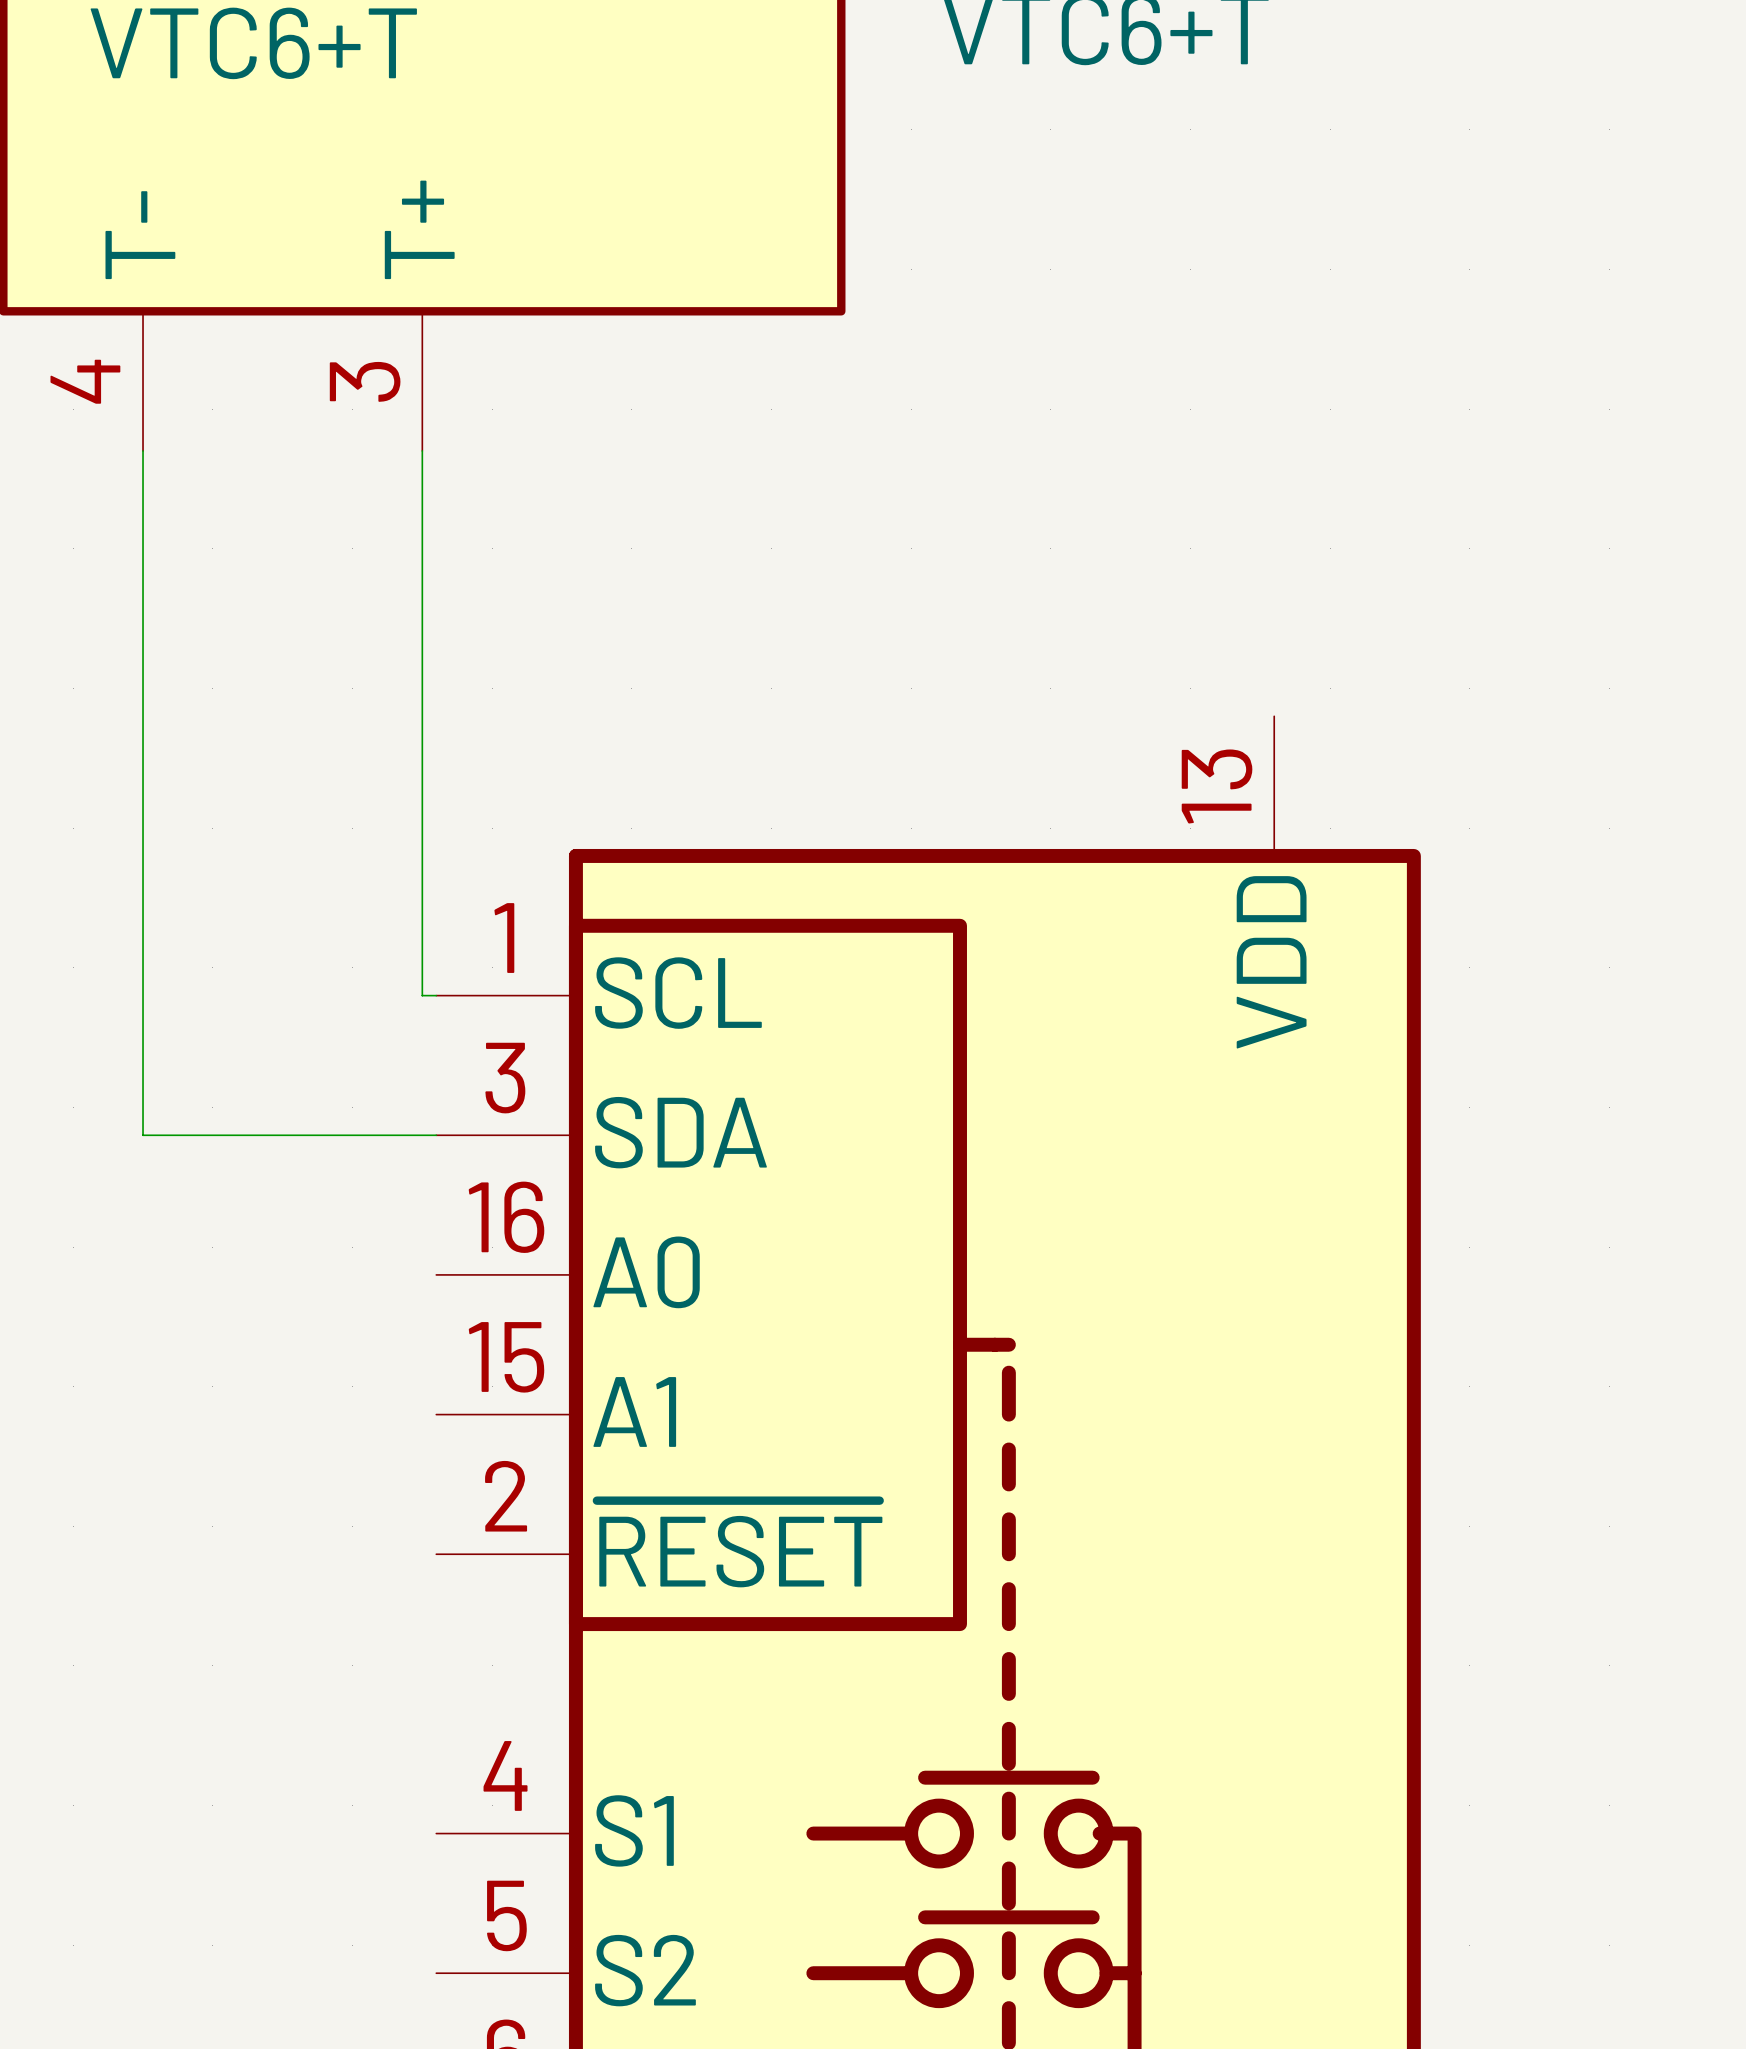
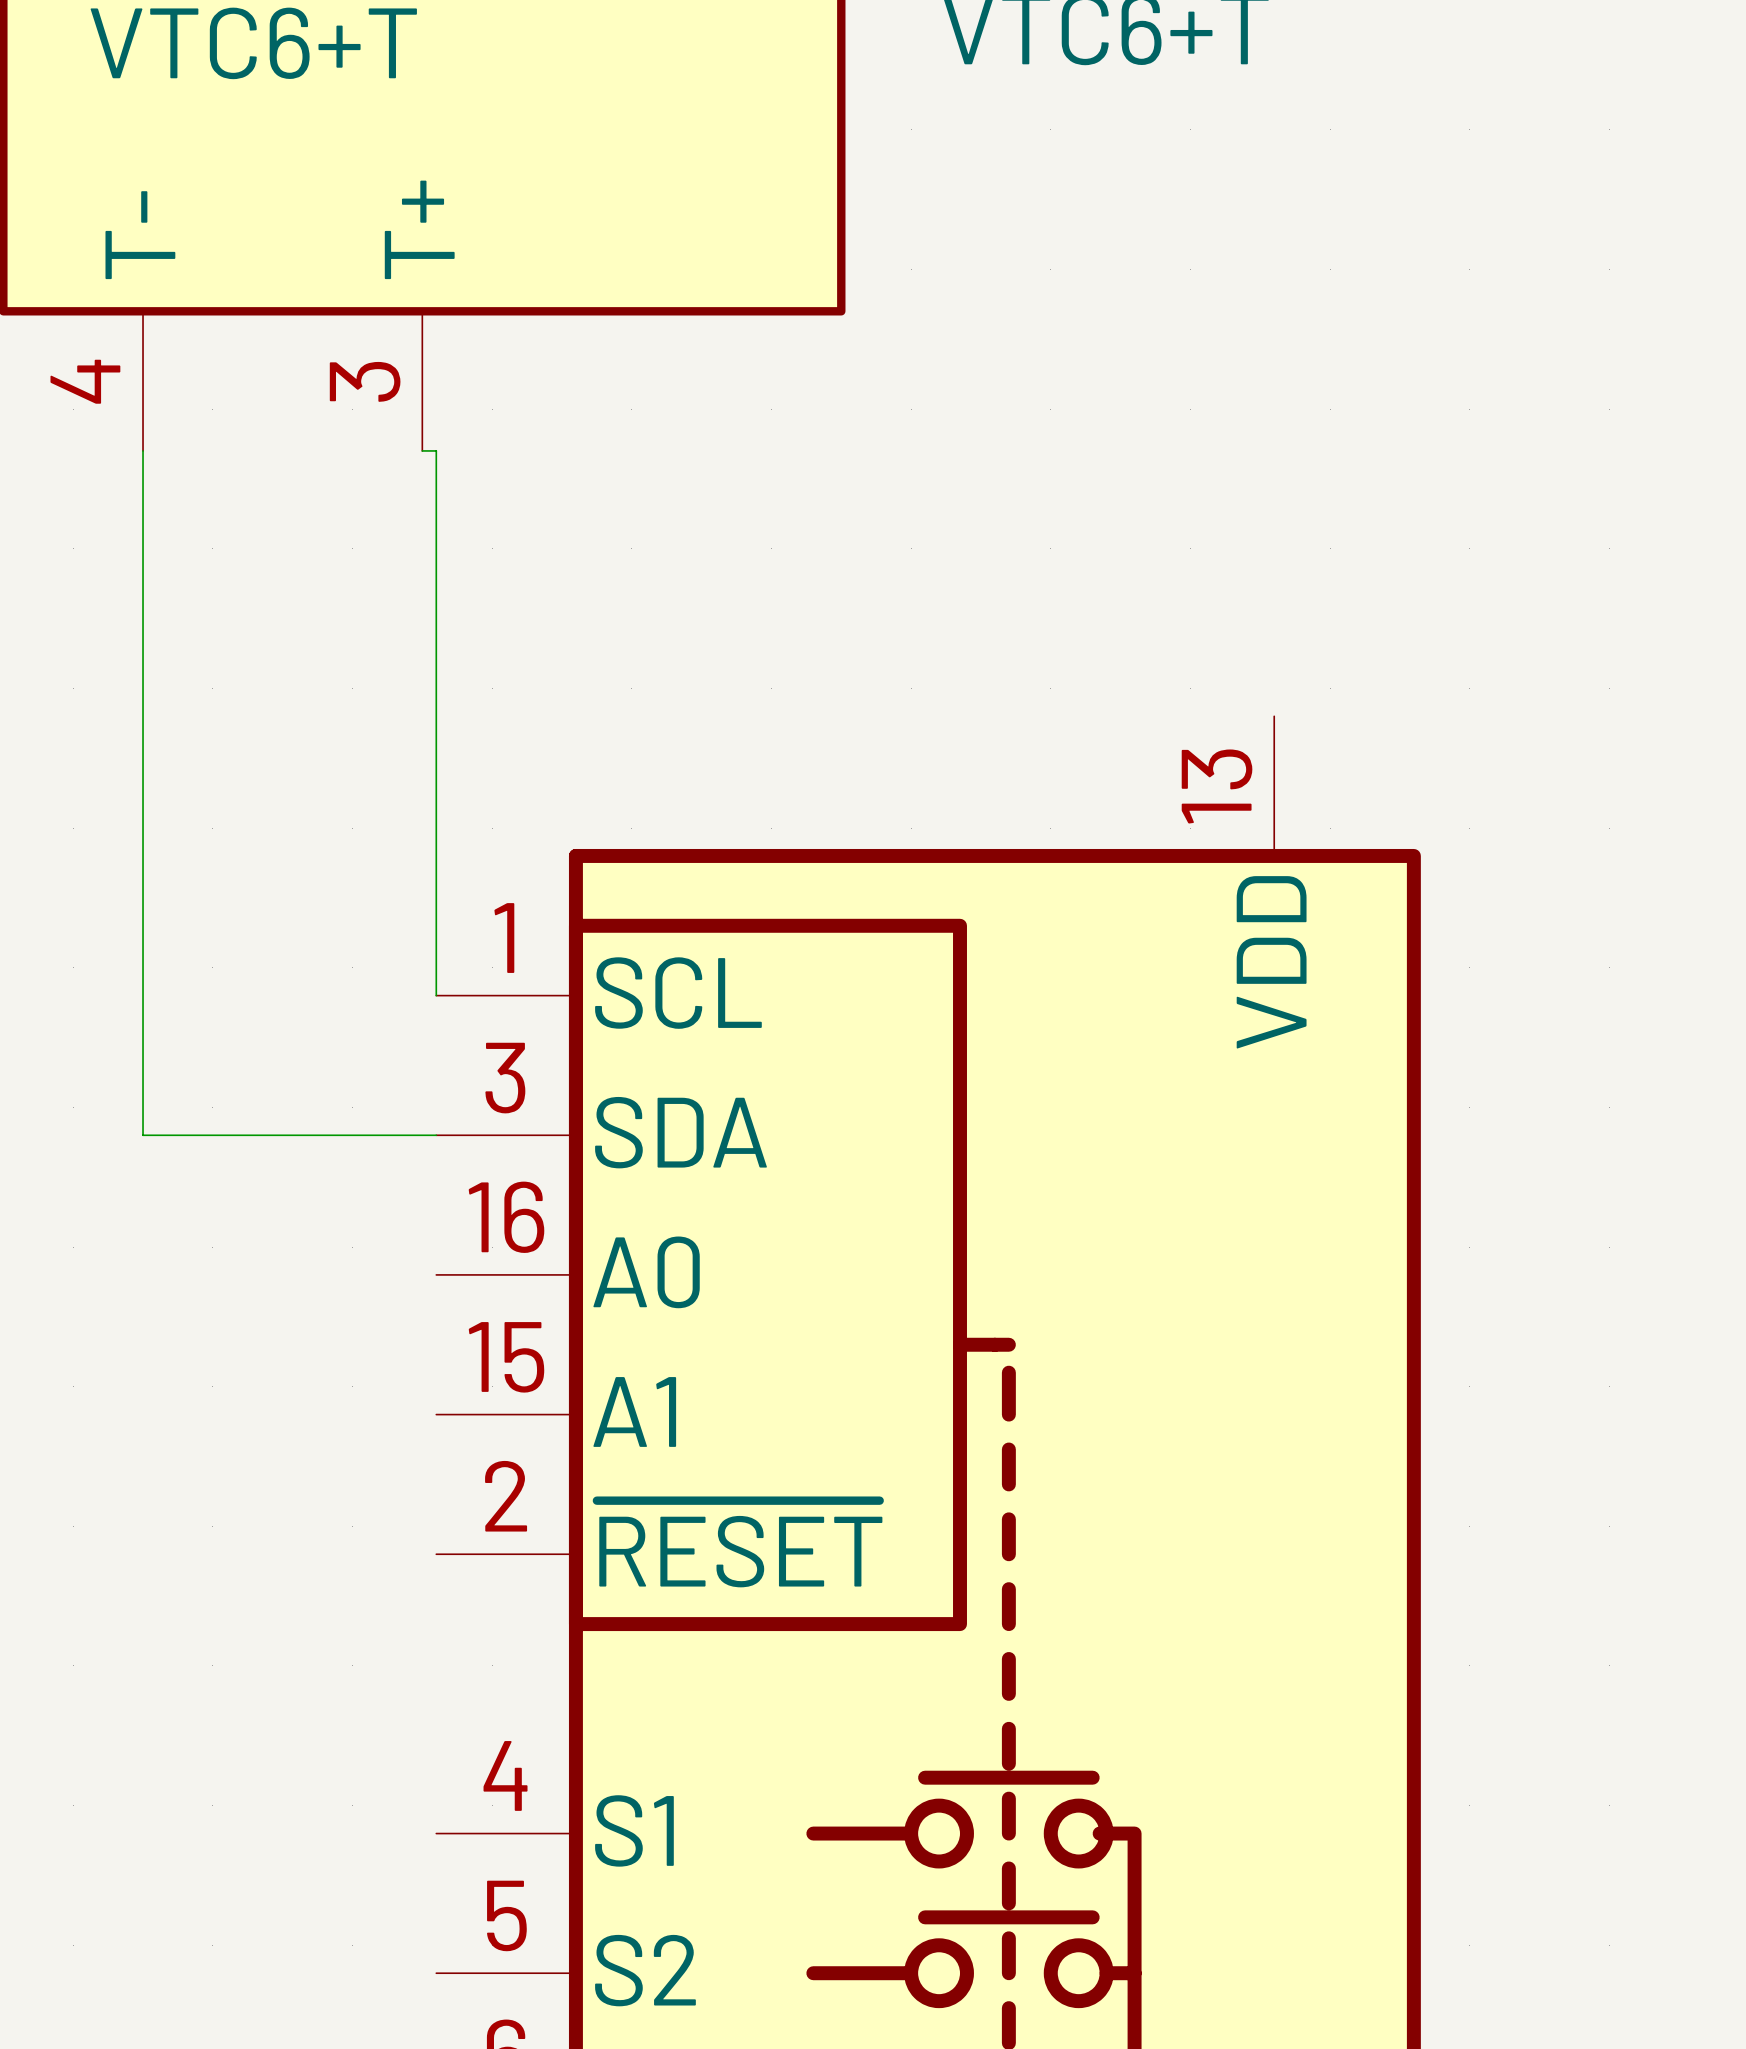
wire: (422, 450) (422, 995) (436, 995) -> (422, 450) (436, 450) (436, 995)

